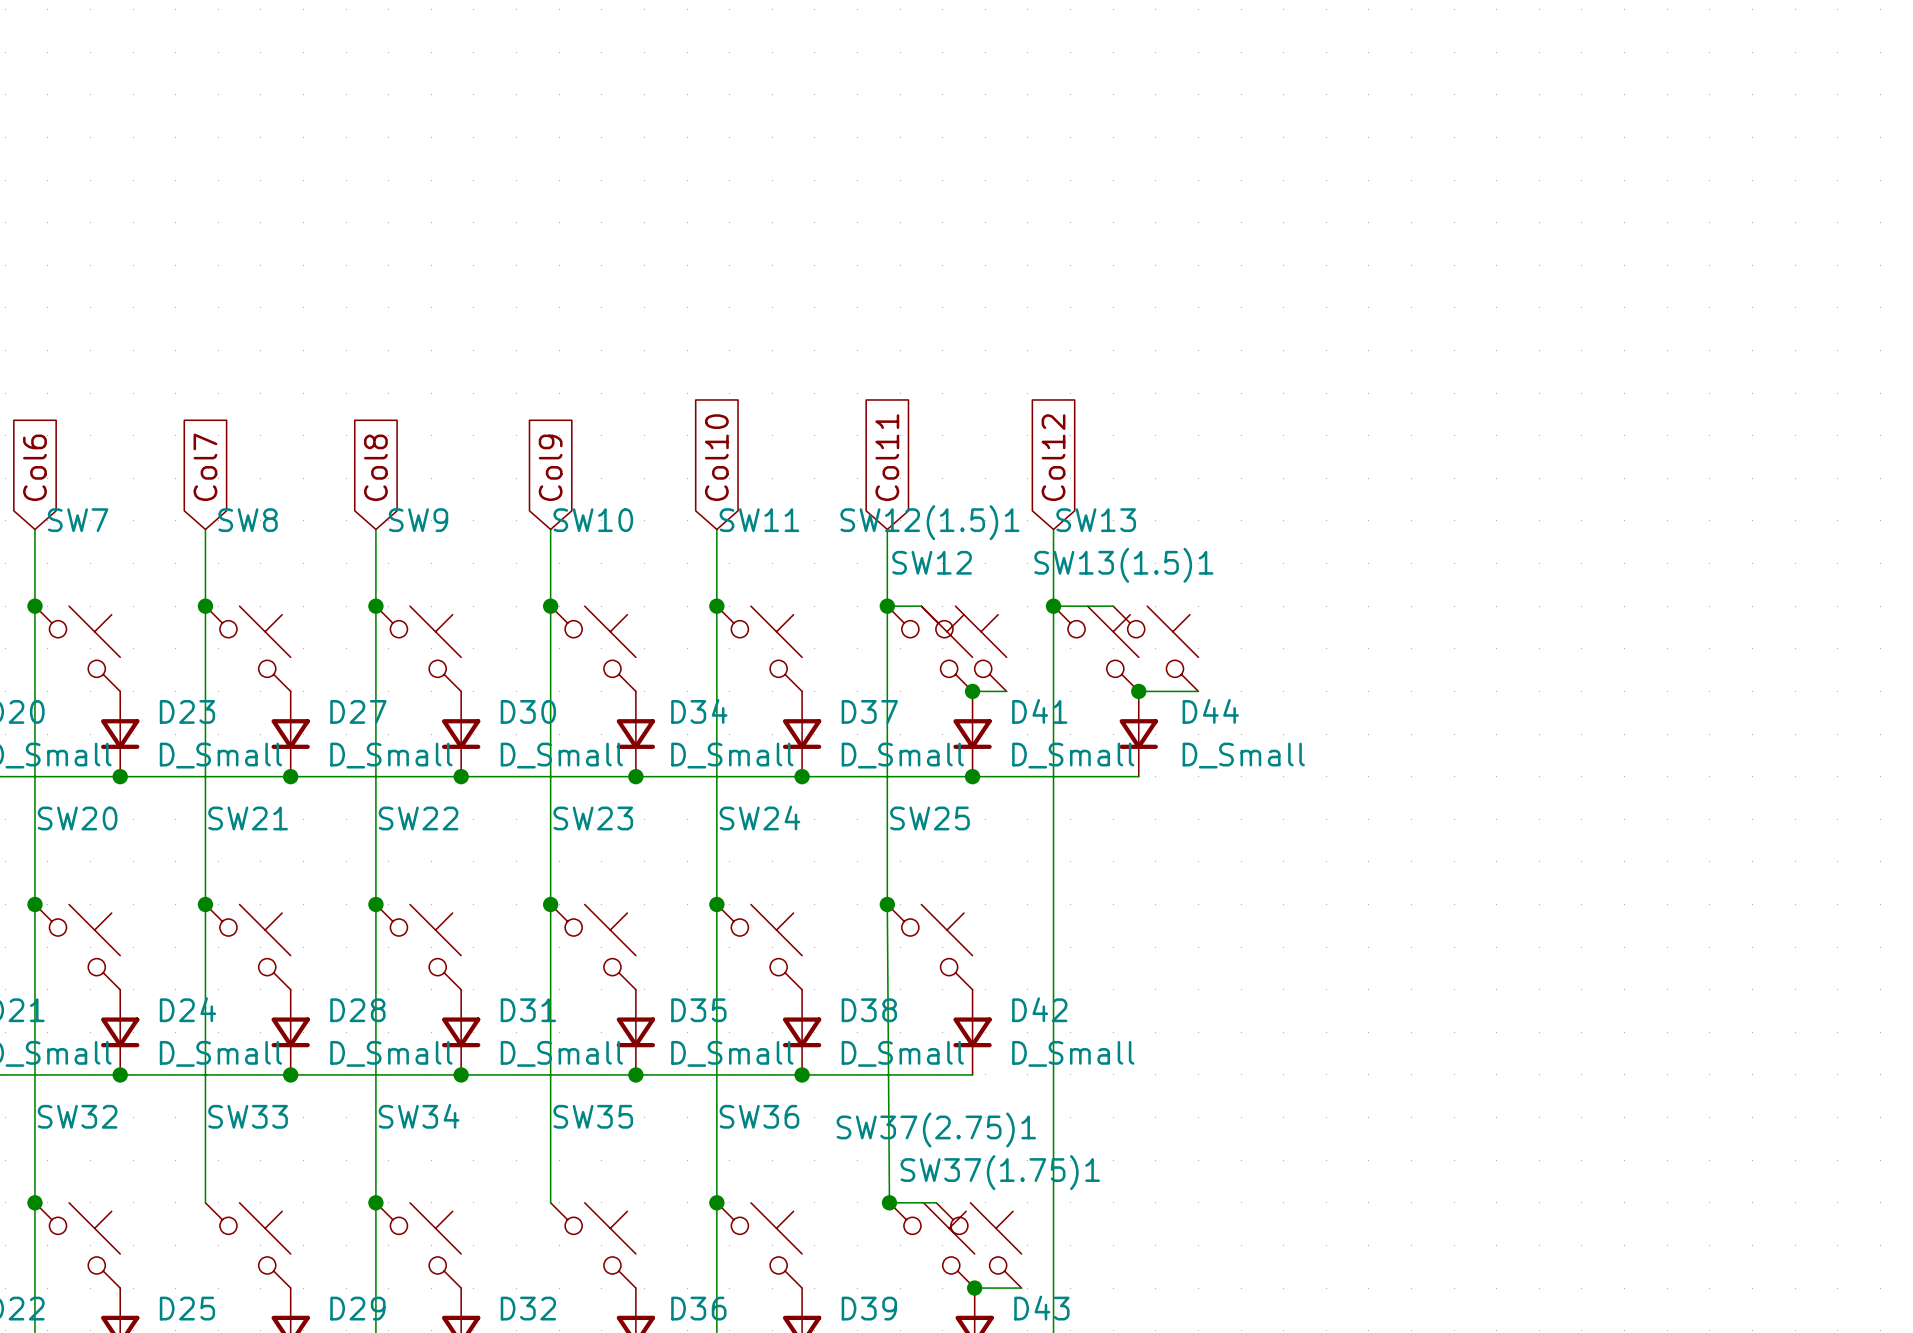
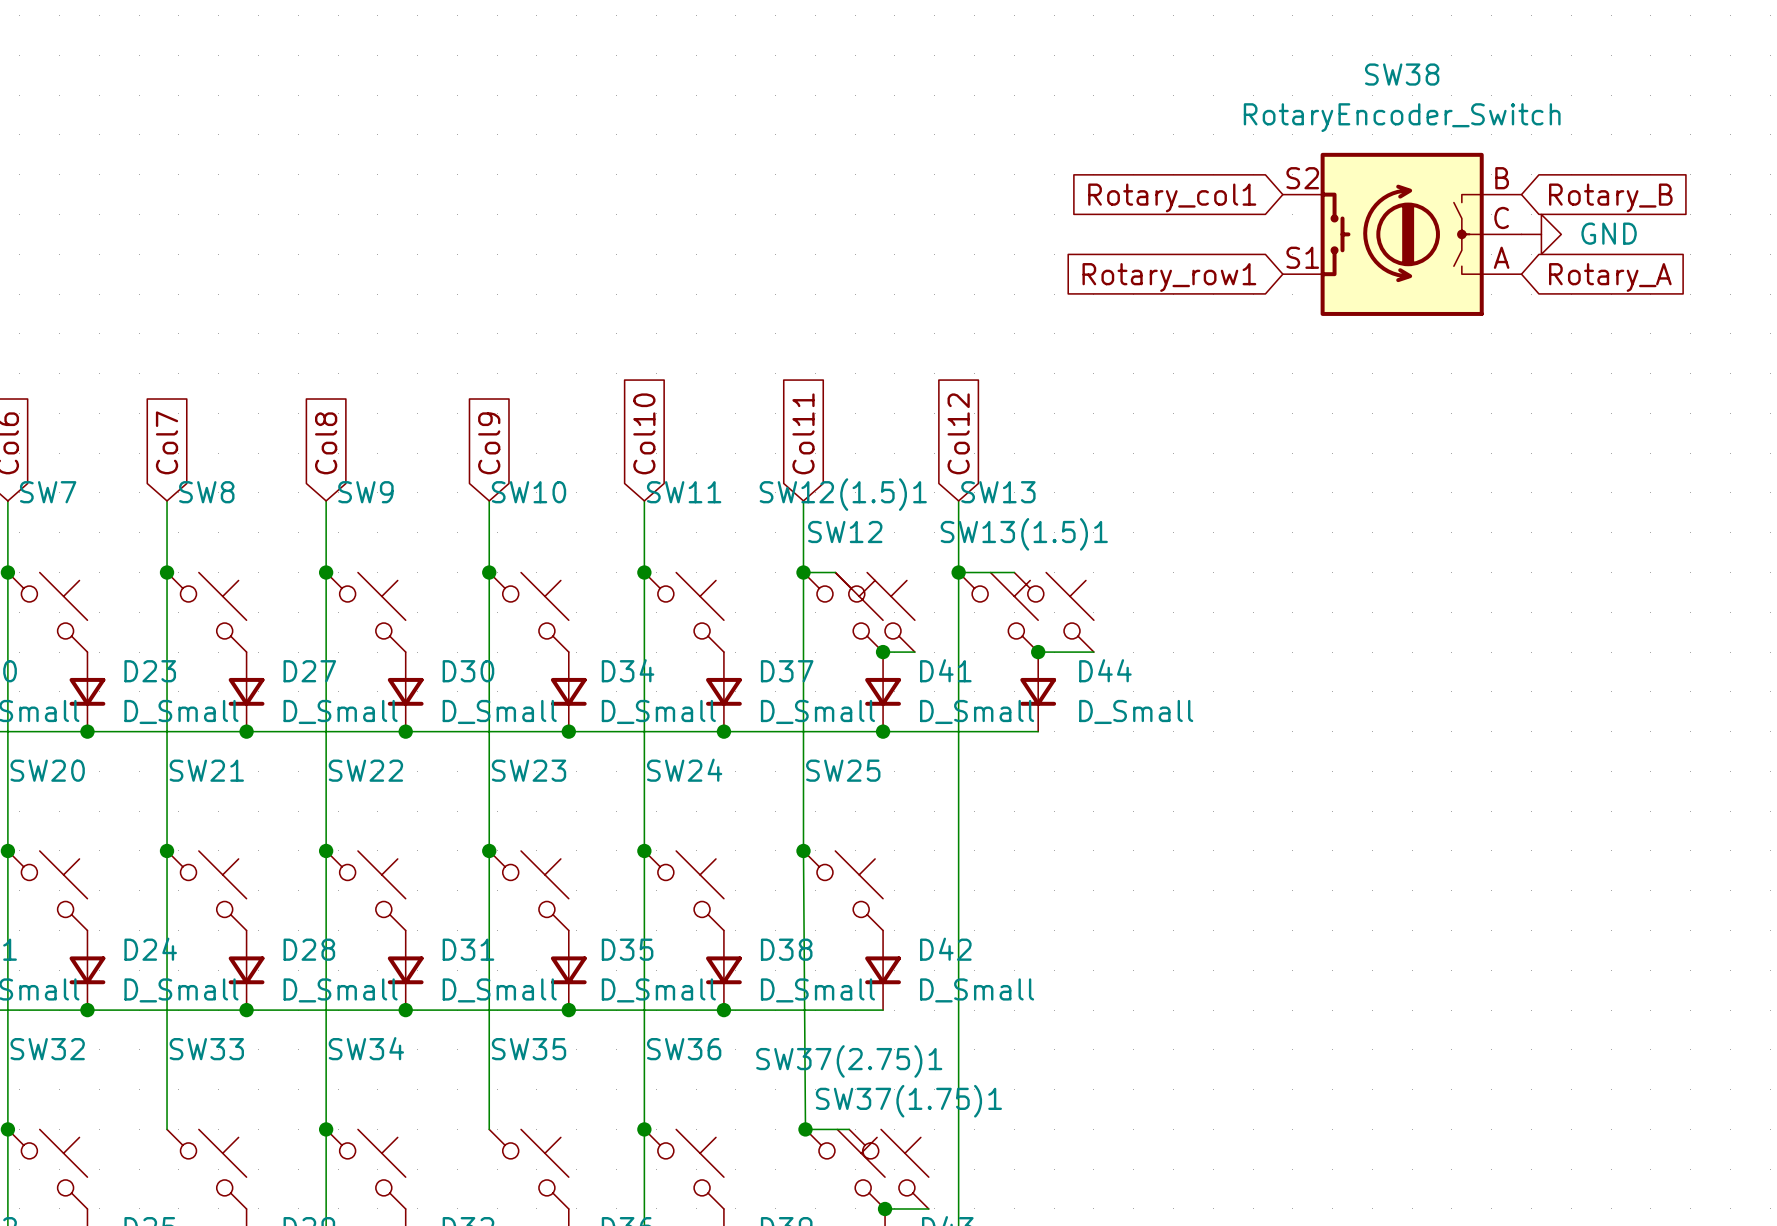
global label: none -> Rotary_col1 (1172, 197)
global label: none -> Rotary_B (1610, 197)
SW38: none -> RotaryEncoder_Switch (1402, 234)
power symbol: none -> GND (1541, 234)
global label: none -> Rotary_row1 (1169, 277)
global label: none -> Rotary_A (1610, 277)

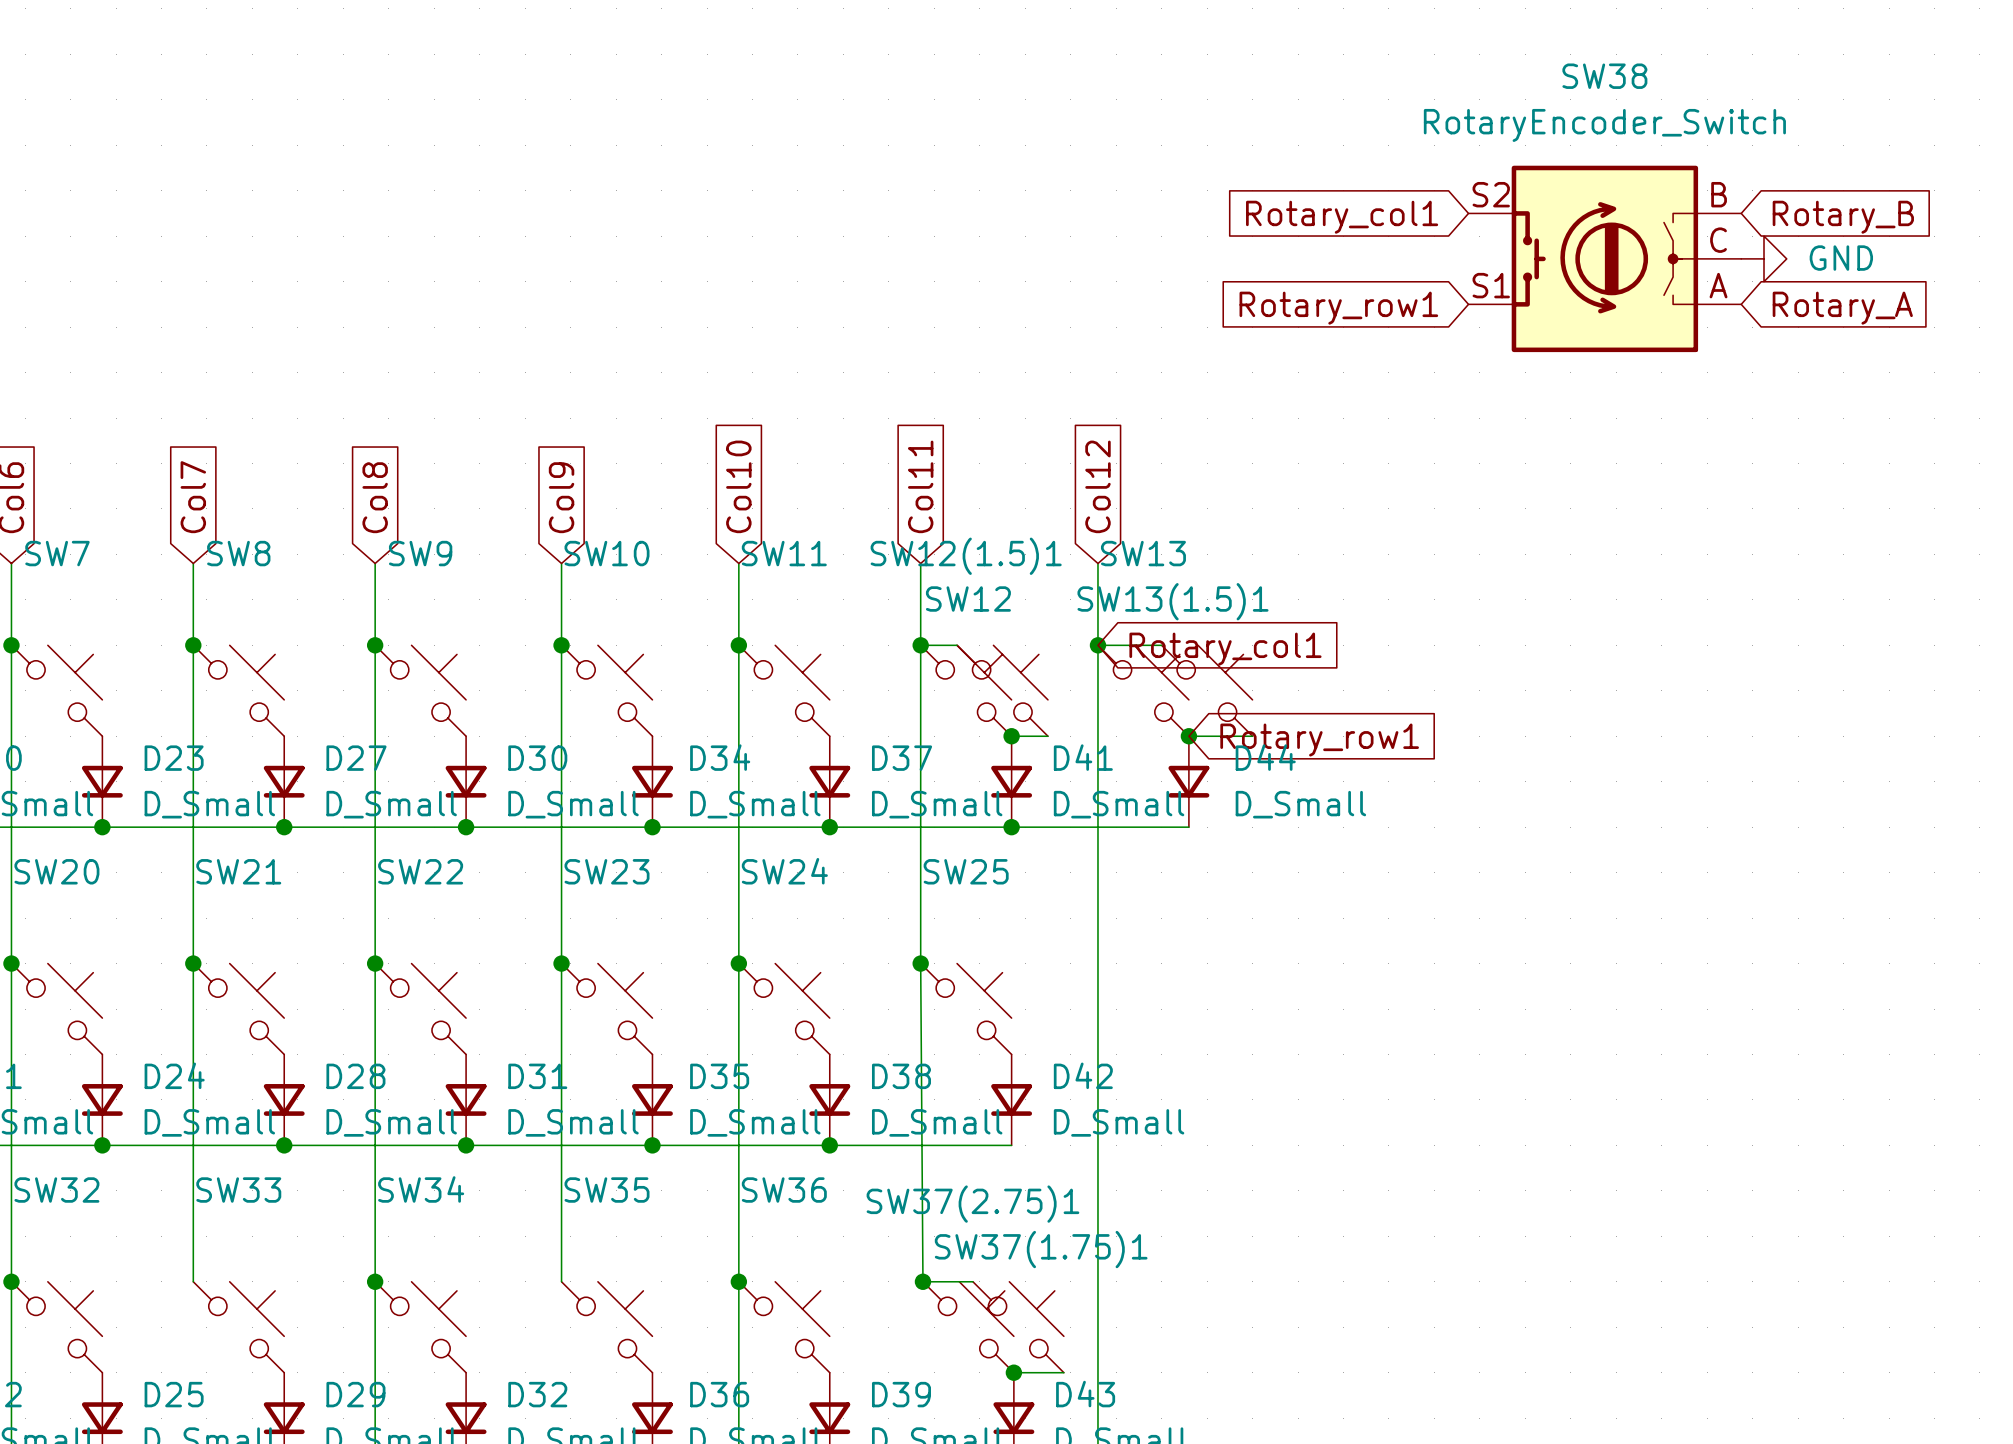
global label: none -> Rotary_col1 (1225, 649)
global label: none -> Rotary_row1 (1319, 740)

